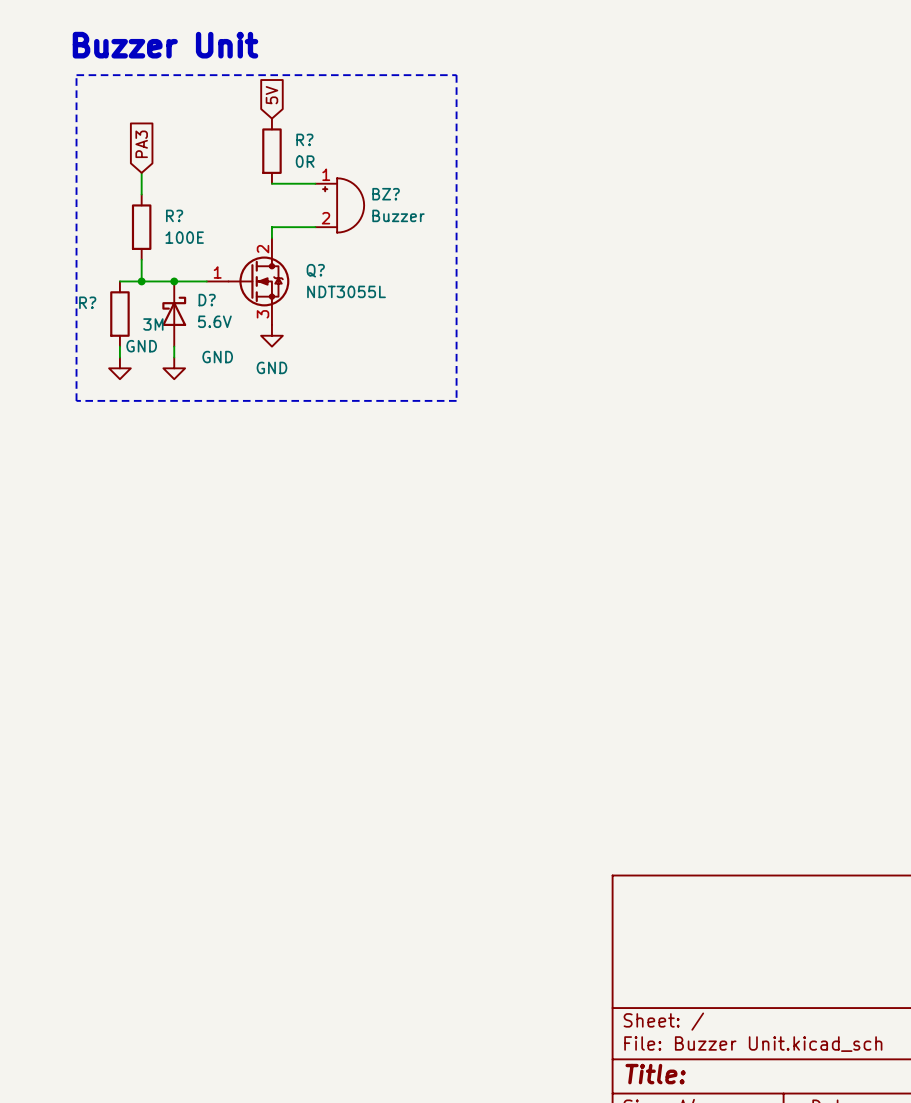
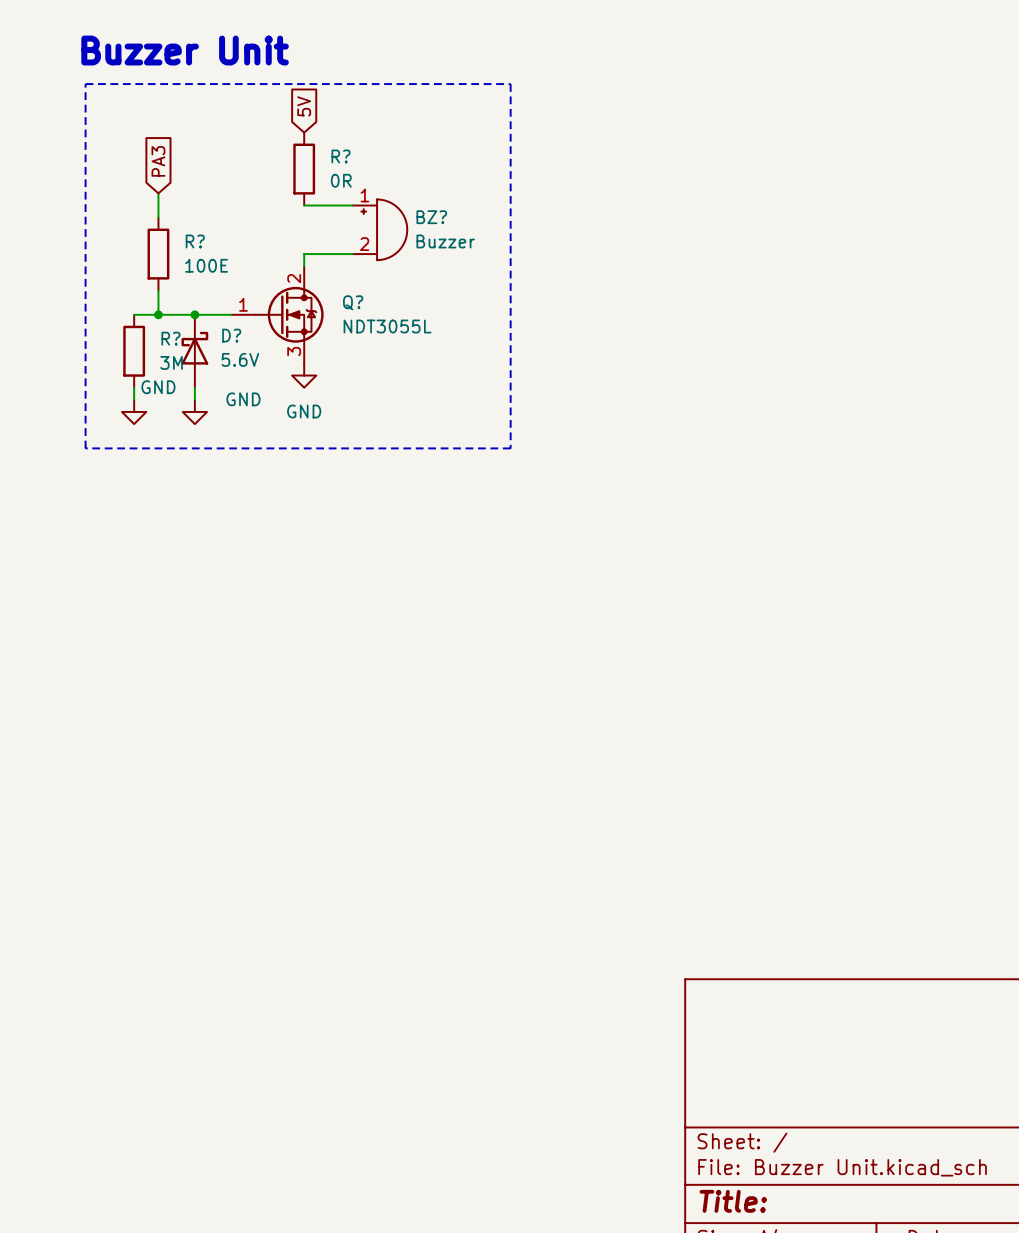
R? name position: R? (87, 302) -> R? (170, 338)

